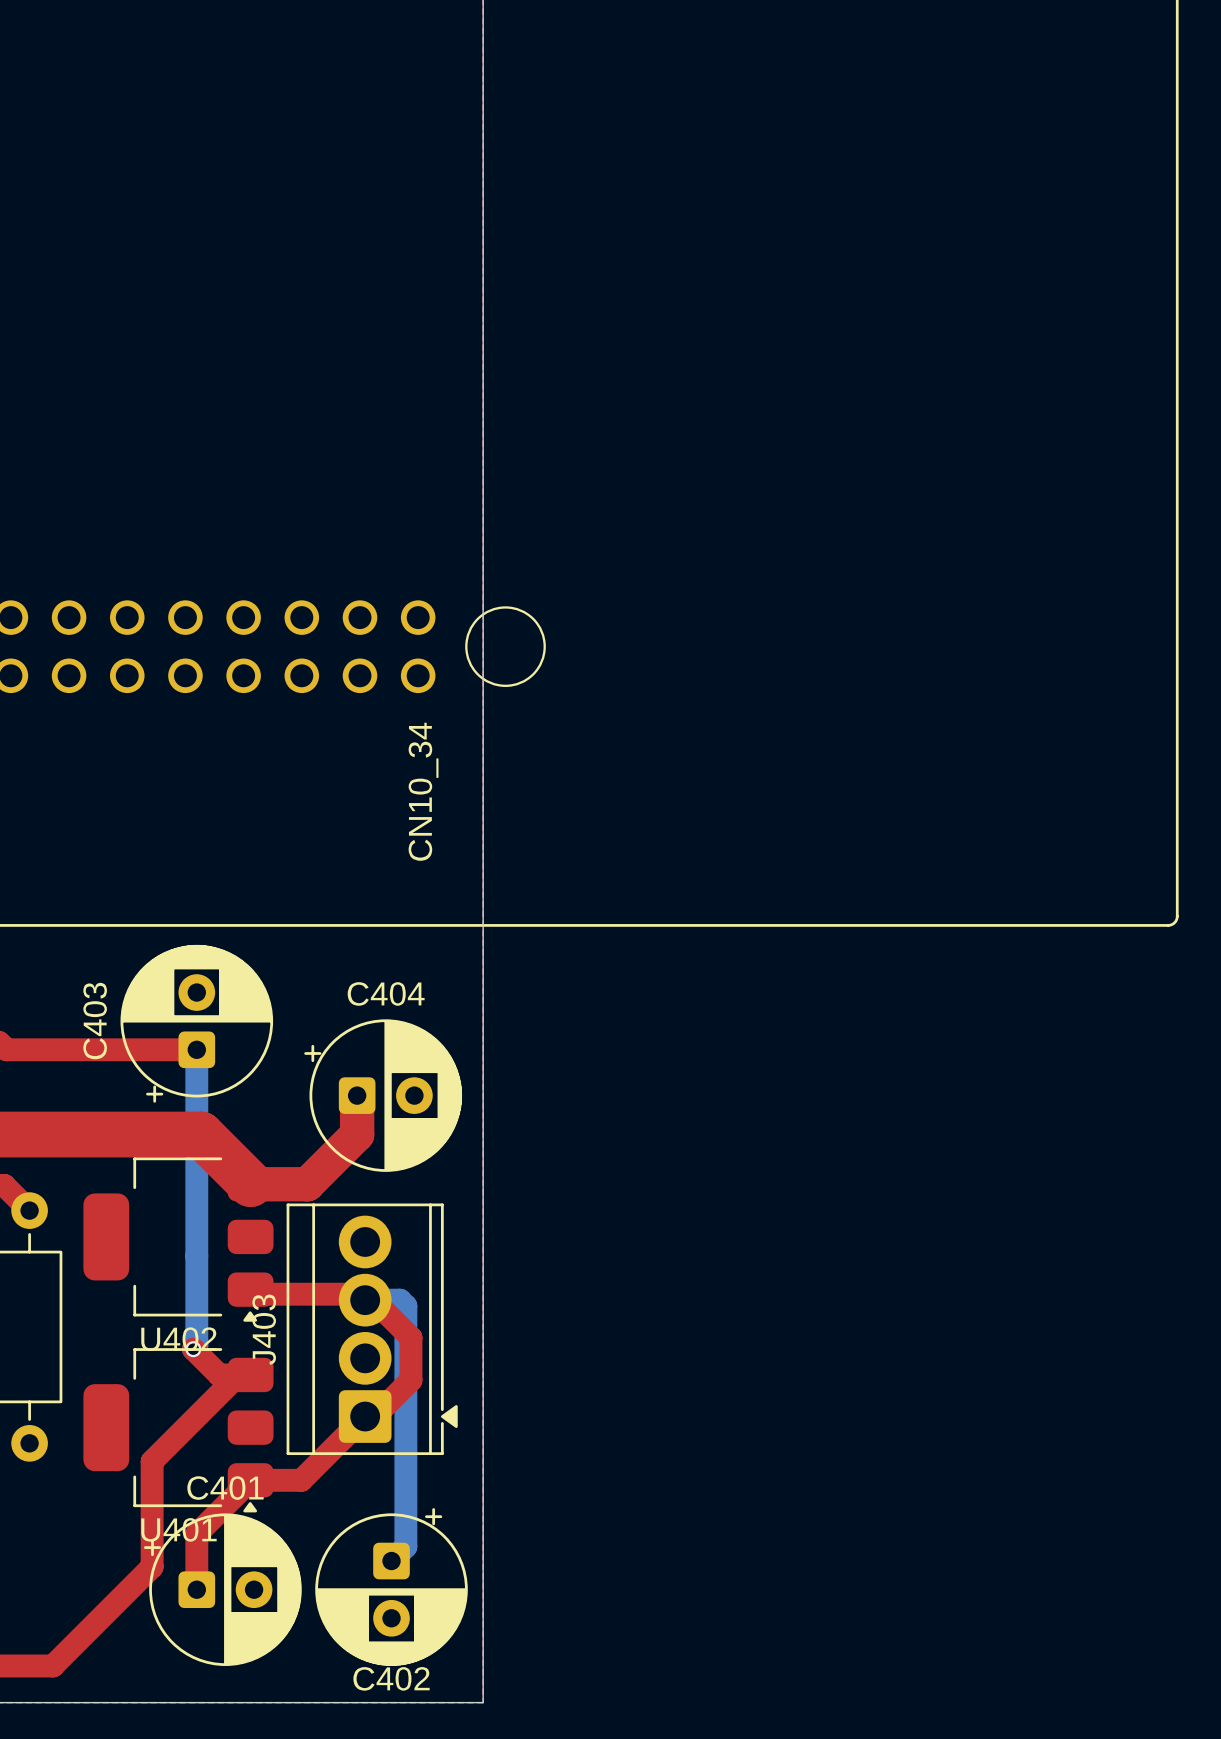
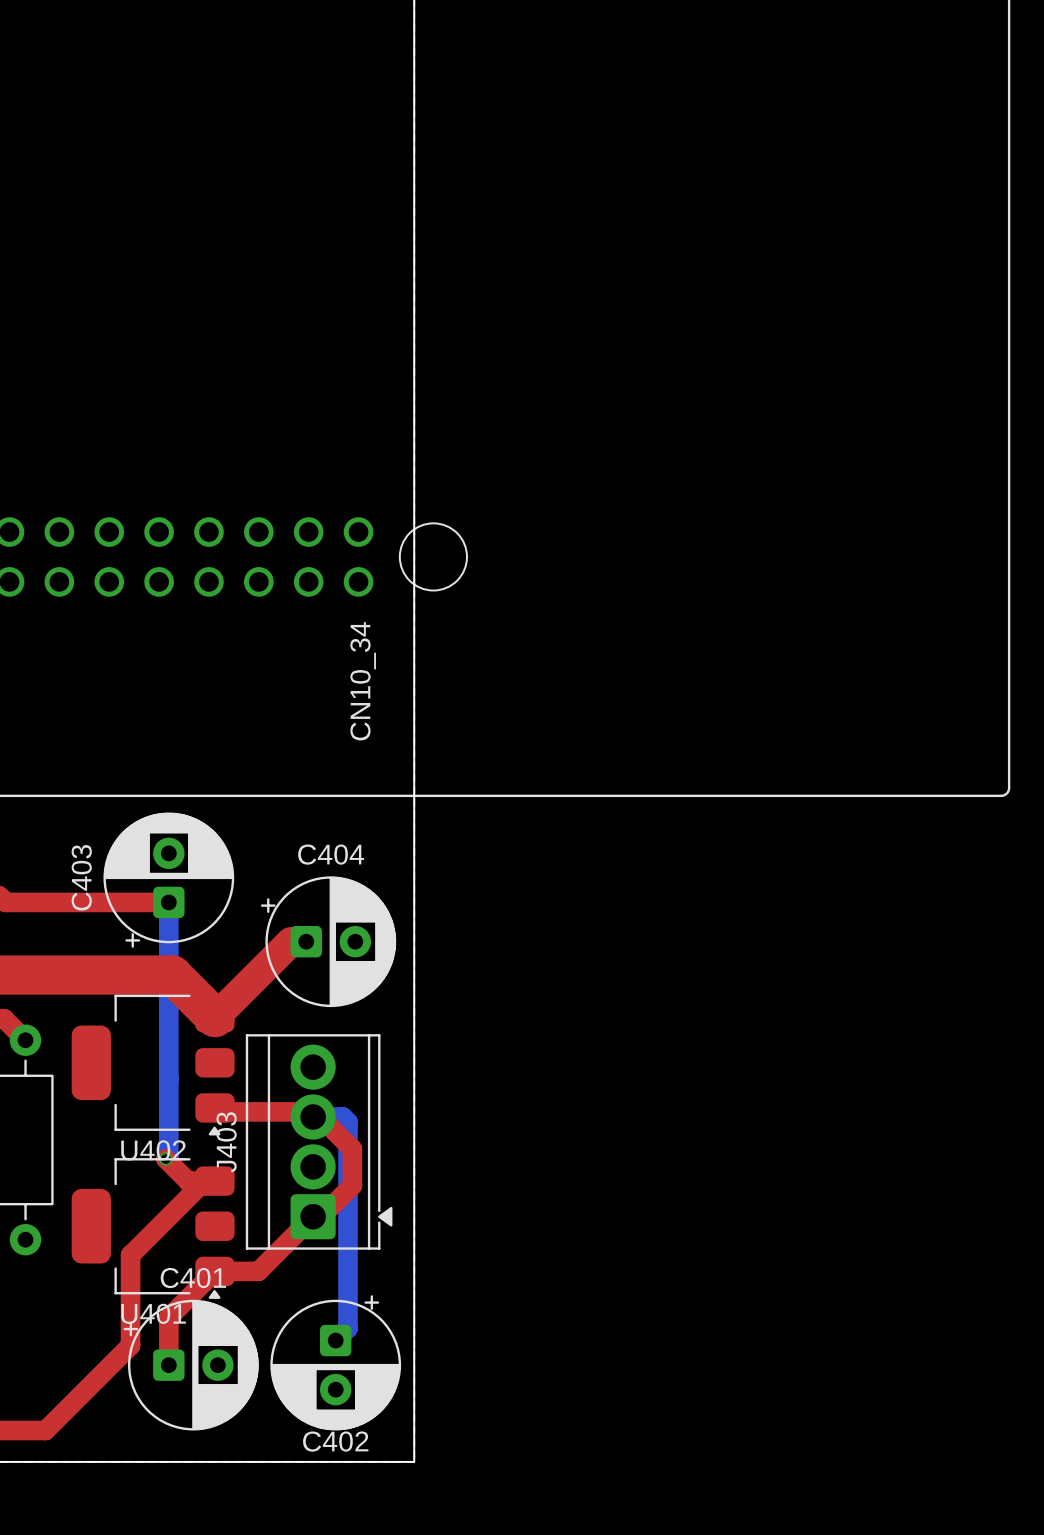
top track: (357, 1095) (357, 1134) (307, 1184) (250, 1184) -> (306, 941) (290, 941) (214, 1017)

